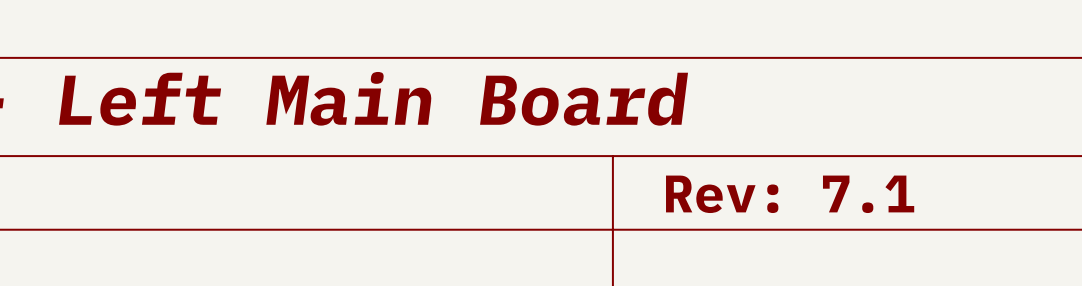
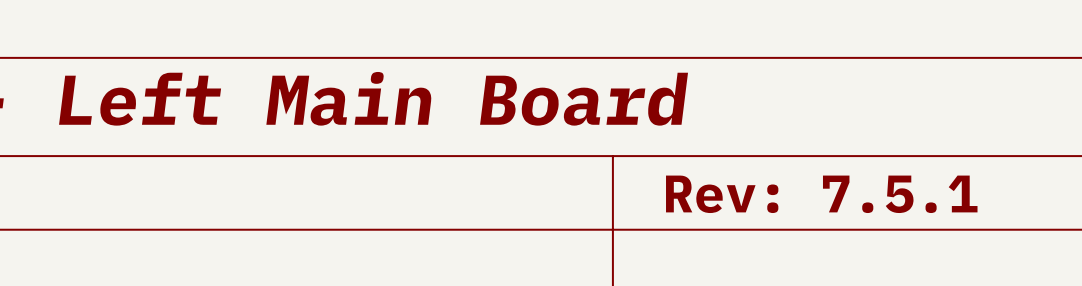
title block: Rev: 7.1 (790, 194) -> Rev: 7.5.1 (821, 194)

